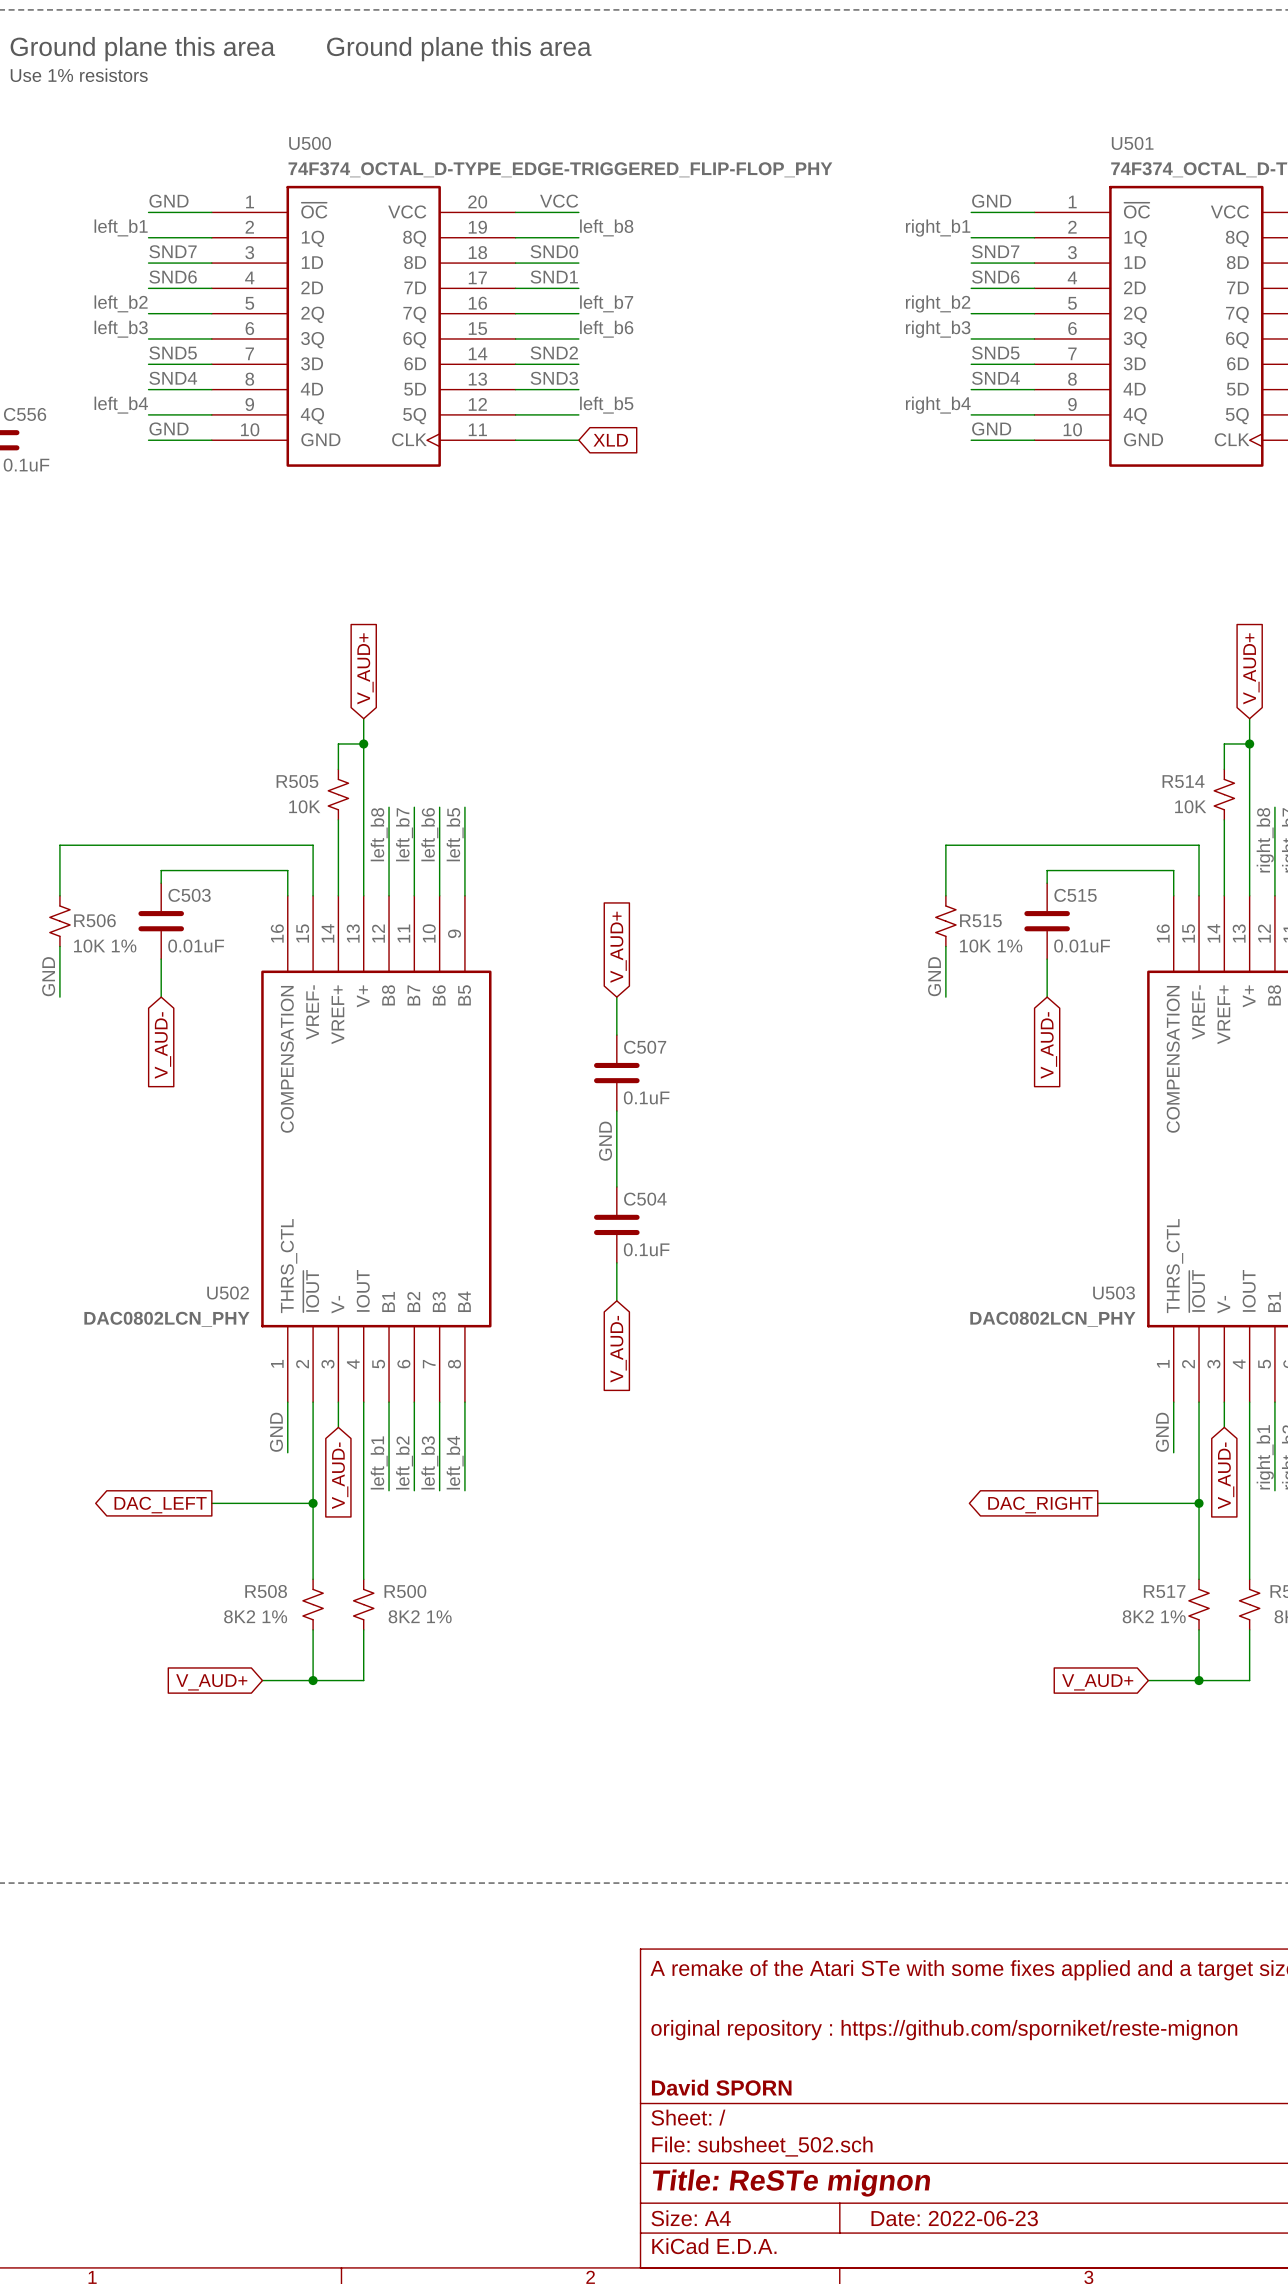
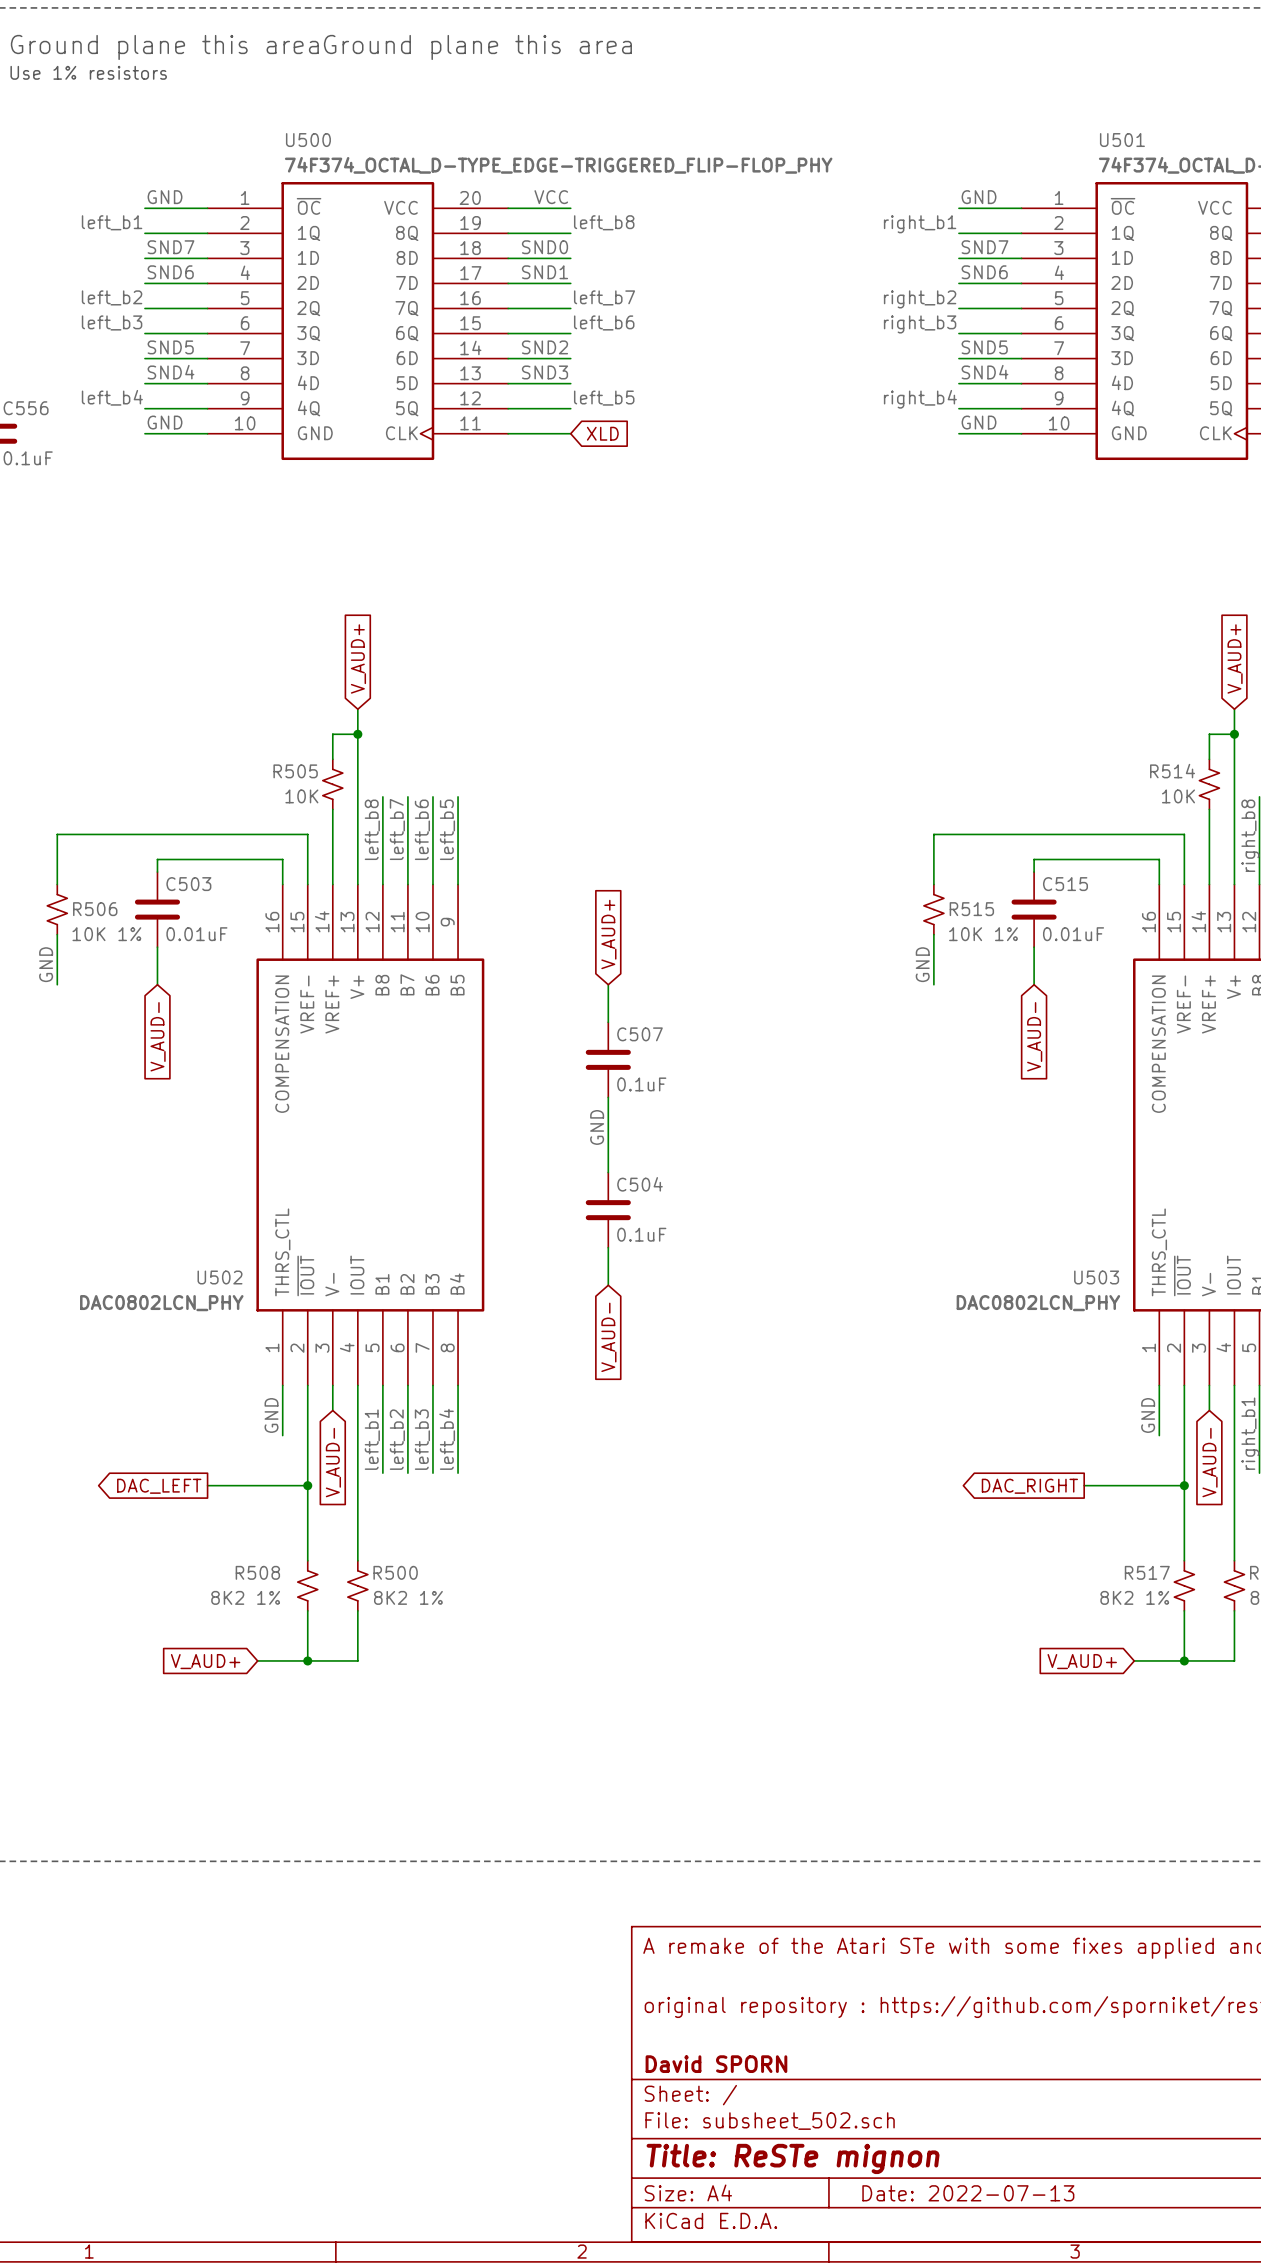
title block: Date: 2022-06-23 (954, 2218) -> Date: 2022-07-13 (968, 2193)

